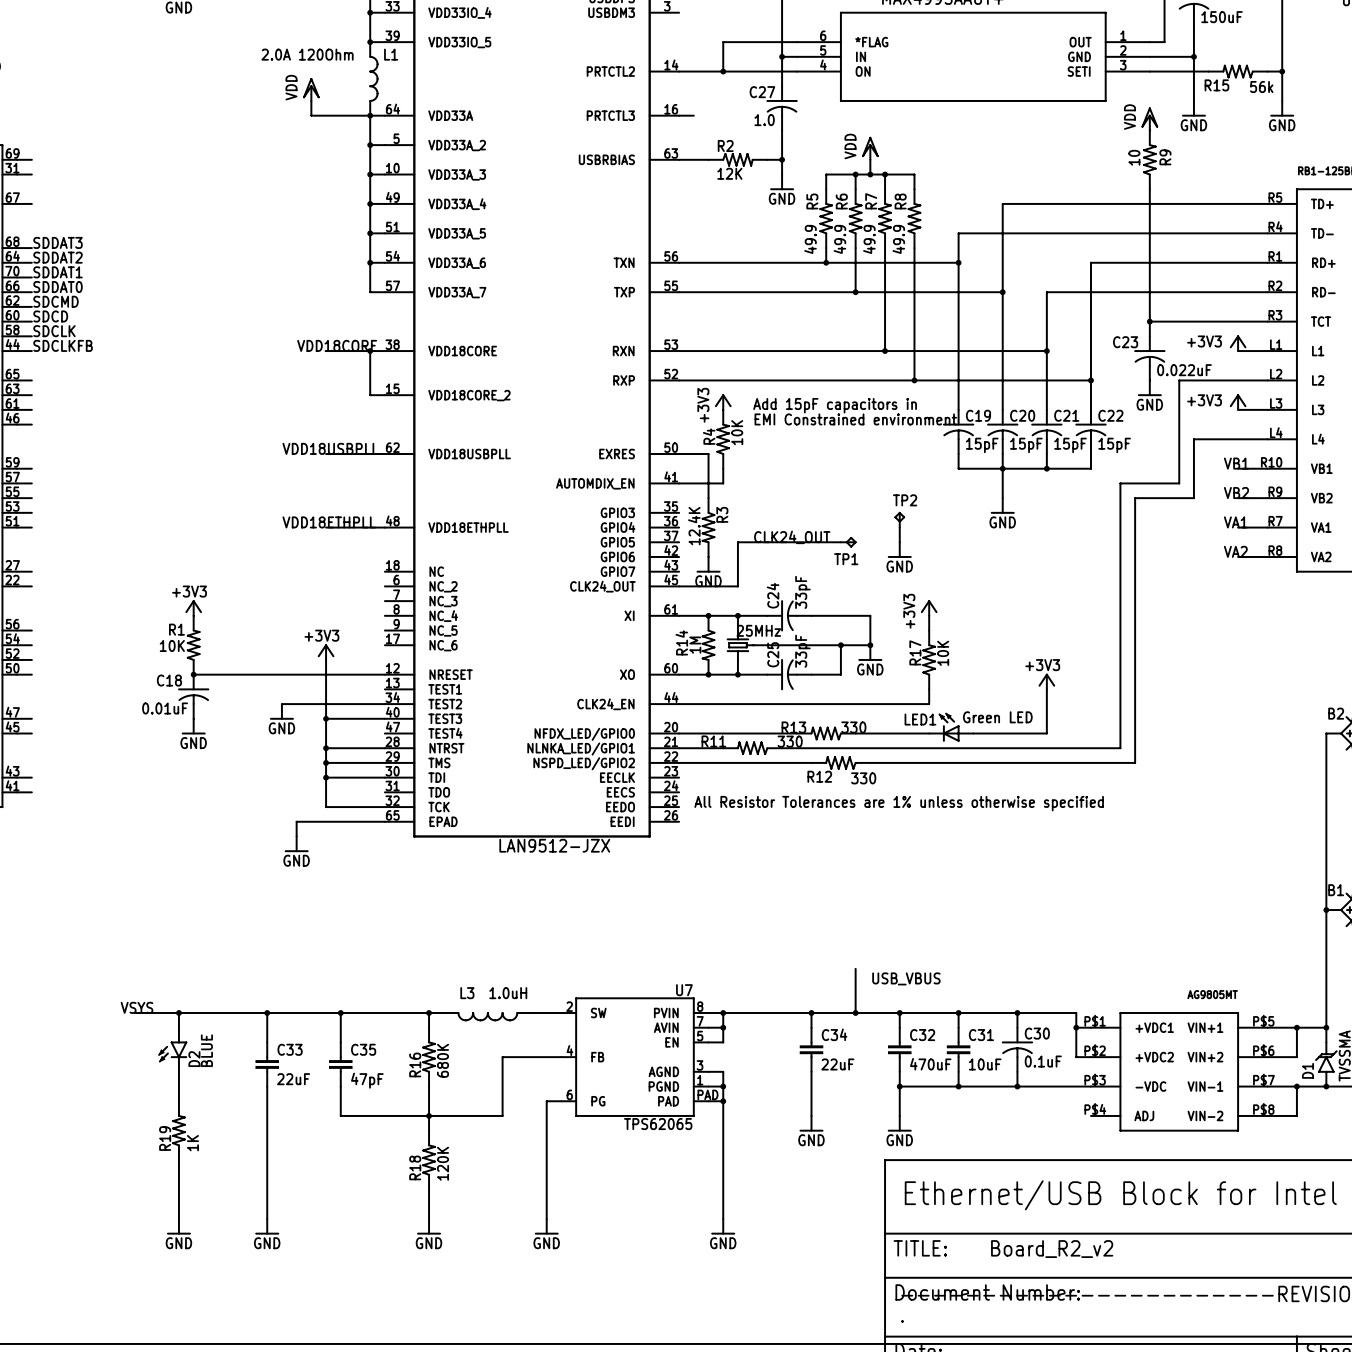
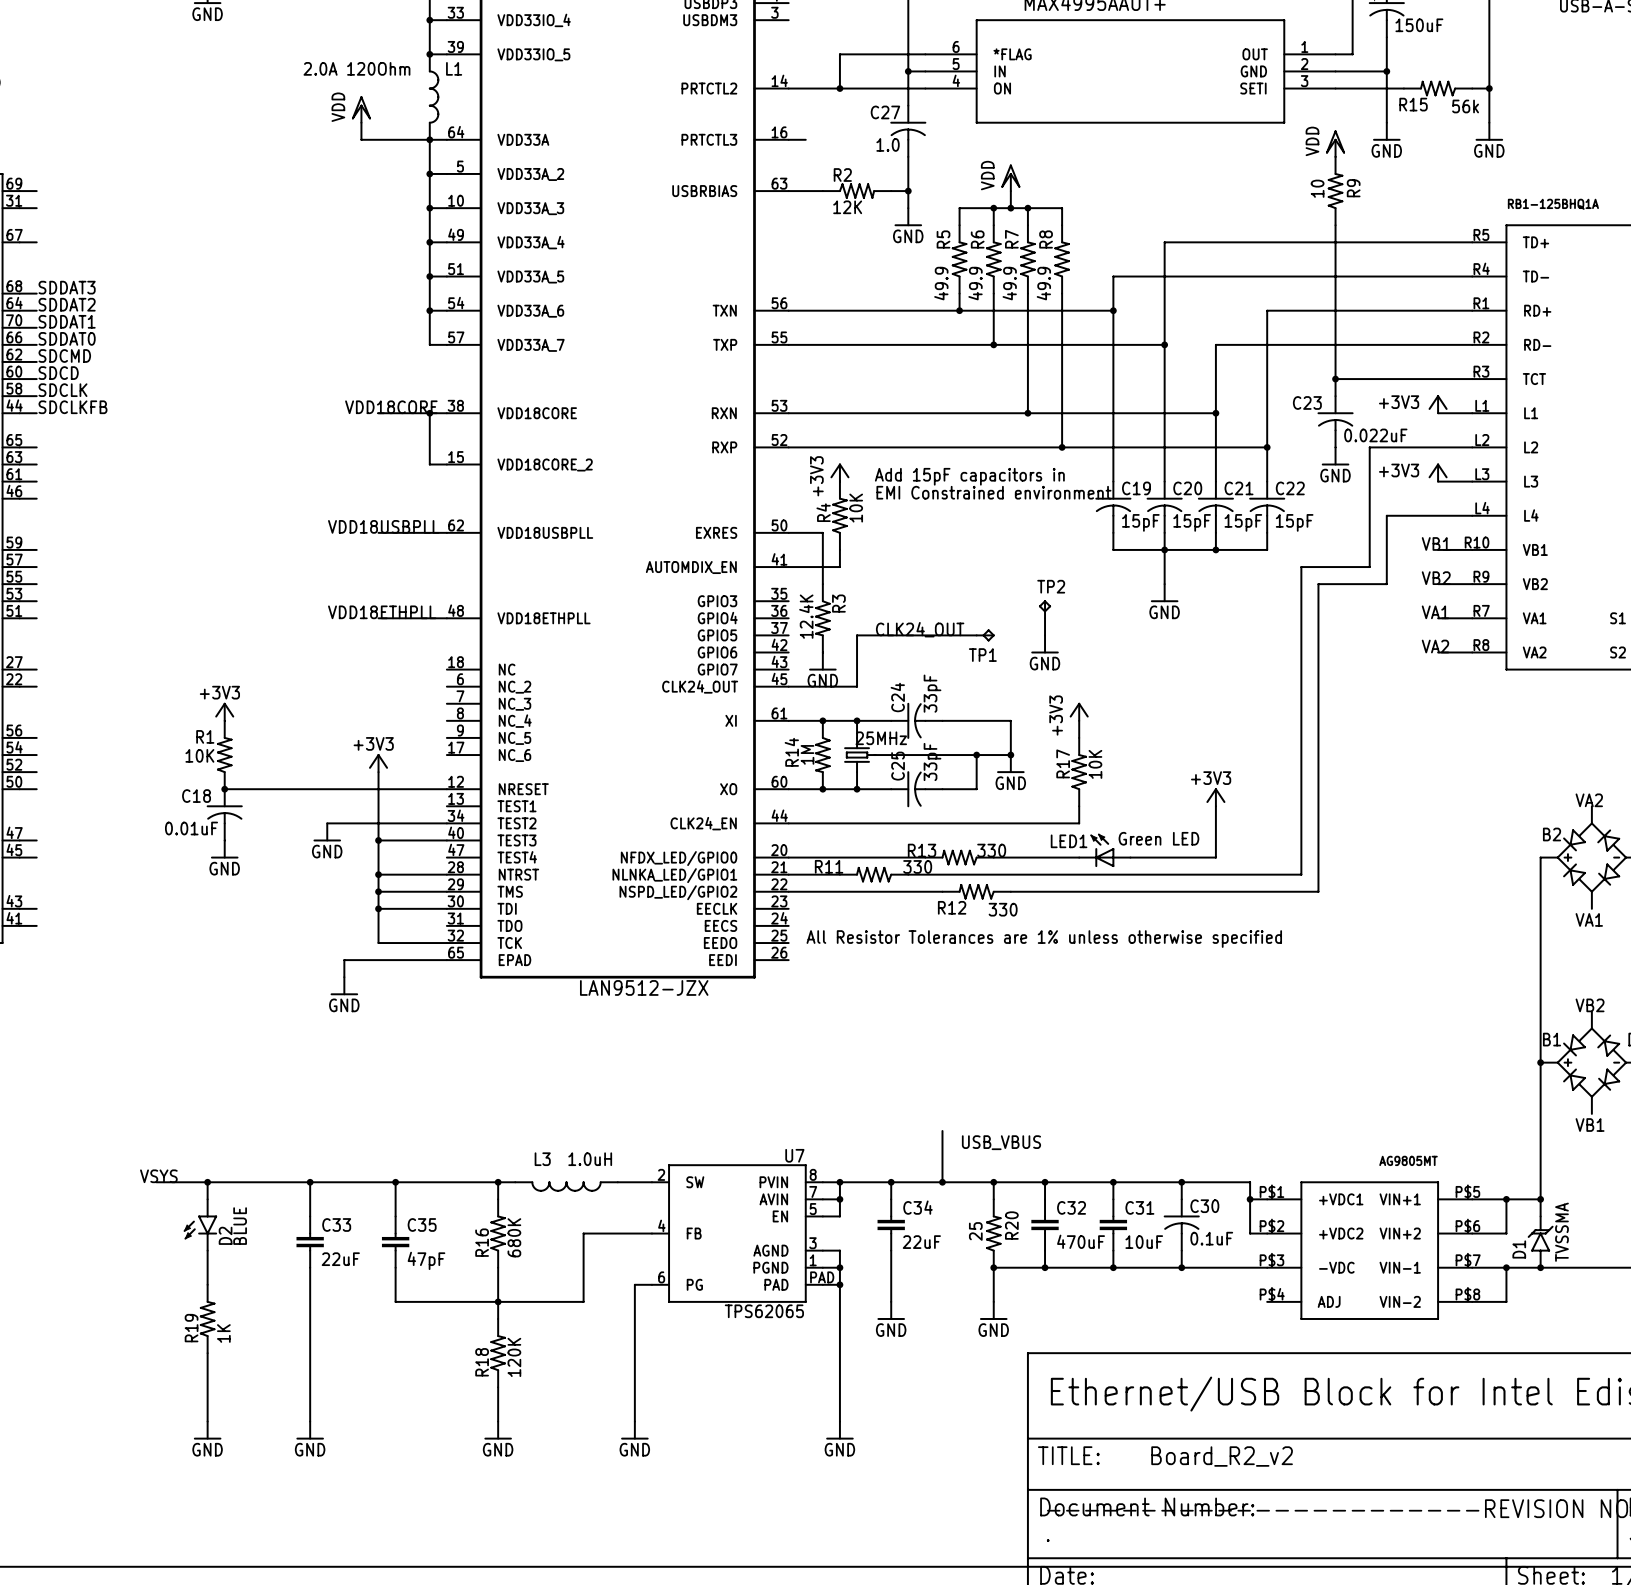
wire: (855, 968) (855, 1012) -> (993, 1199) (993, 1182)
label position: USB_VBUS (906, 978) -> USB_VBUS (1001, 1142)
wire: none -> (891, 1182) (891, 1199)
junction: none -> (891, 1182)
wire: (811, 1012) (811, 1027) -> (942, 1182) (942, 1131)
C34 position: (811, 1049) -> (891, 1224)
R20: none -> 25 (993, 1233)
wire: (811, 1071) (811, 1115) -> (891, 1250) (891, 1301)
junction: none -> (993, 1267)
wire: (899, 1086) (899, 1115) -> (1045, 1267) (993, 1267) (993, 1301)
power symbol: none -> GND (891, 1310)
power symbol: GND (811, 1123) -> none
power symbol: none -> GND (993, 1310)
power symbol: GND (899, 1123) -> none

